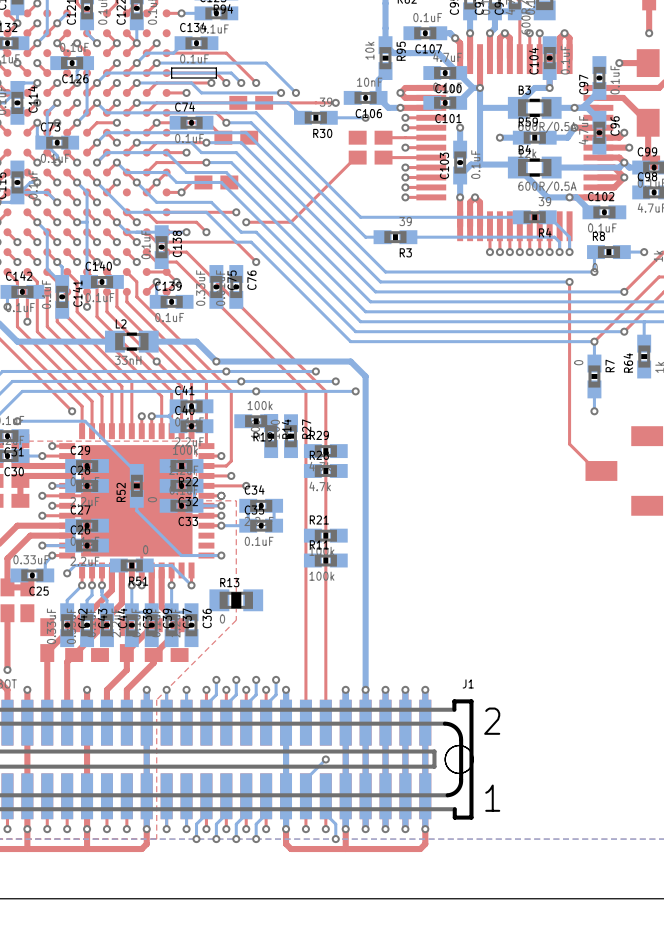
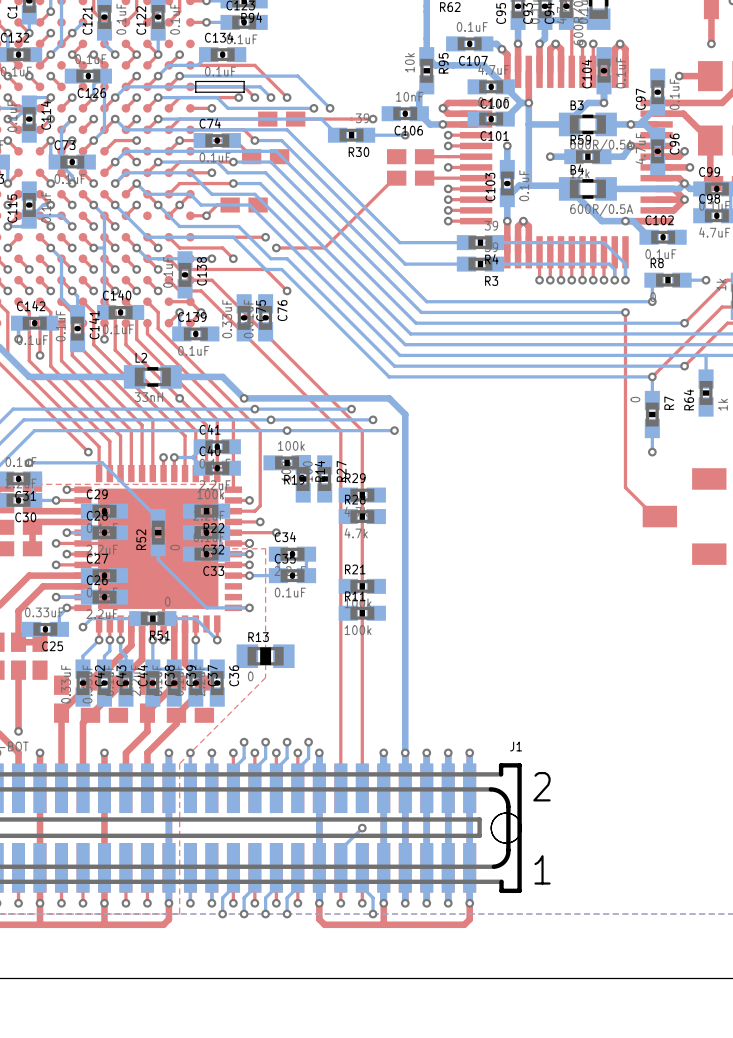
bottom track: (448, 217) (422, 217) -> (601, 242) (573, 242)
R4 position: (534, 217) -> (480, 242)
R3 position: (395, 237) -> (480, 264)
bottom track: (448, 237) (422, 237) -> (451, 264) (423, 264)

